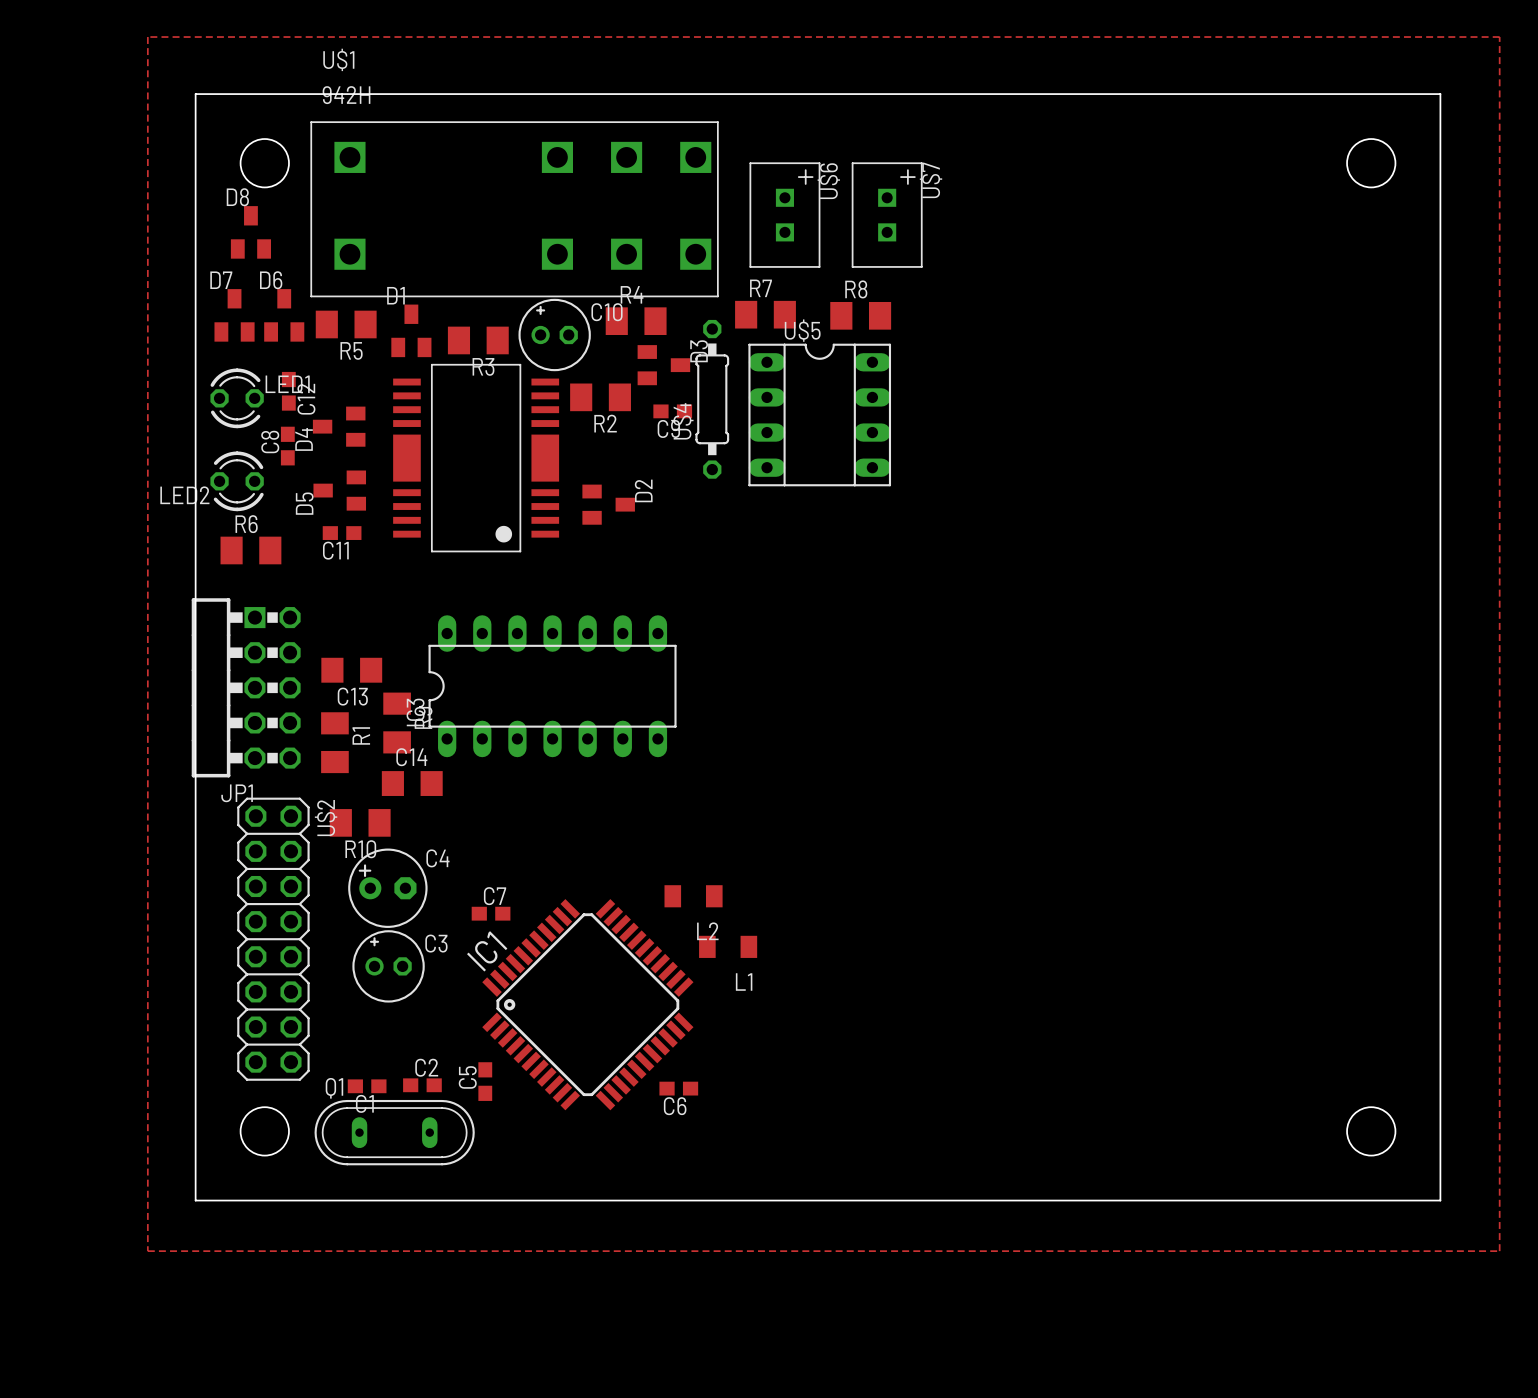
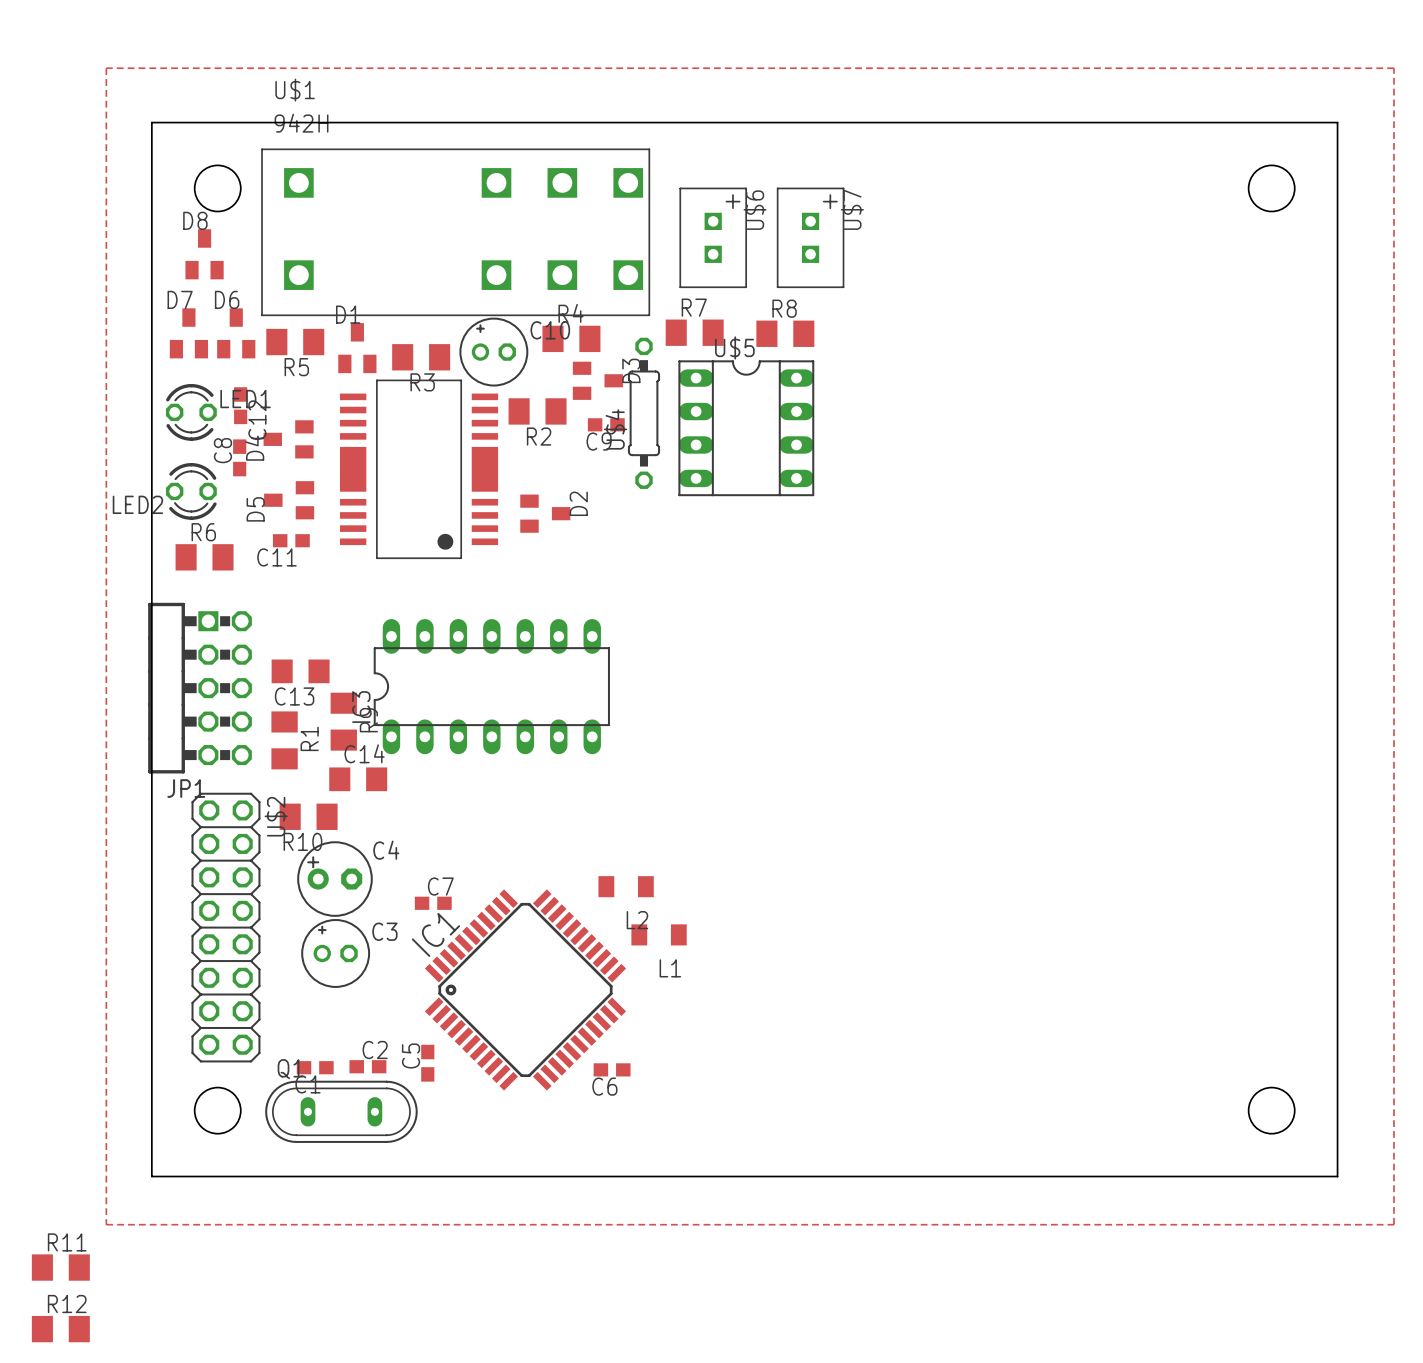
R11: none -> (60, 1267)
R12: none -> (60, 1329)

